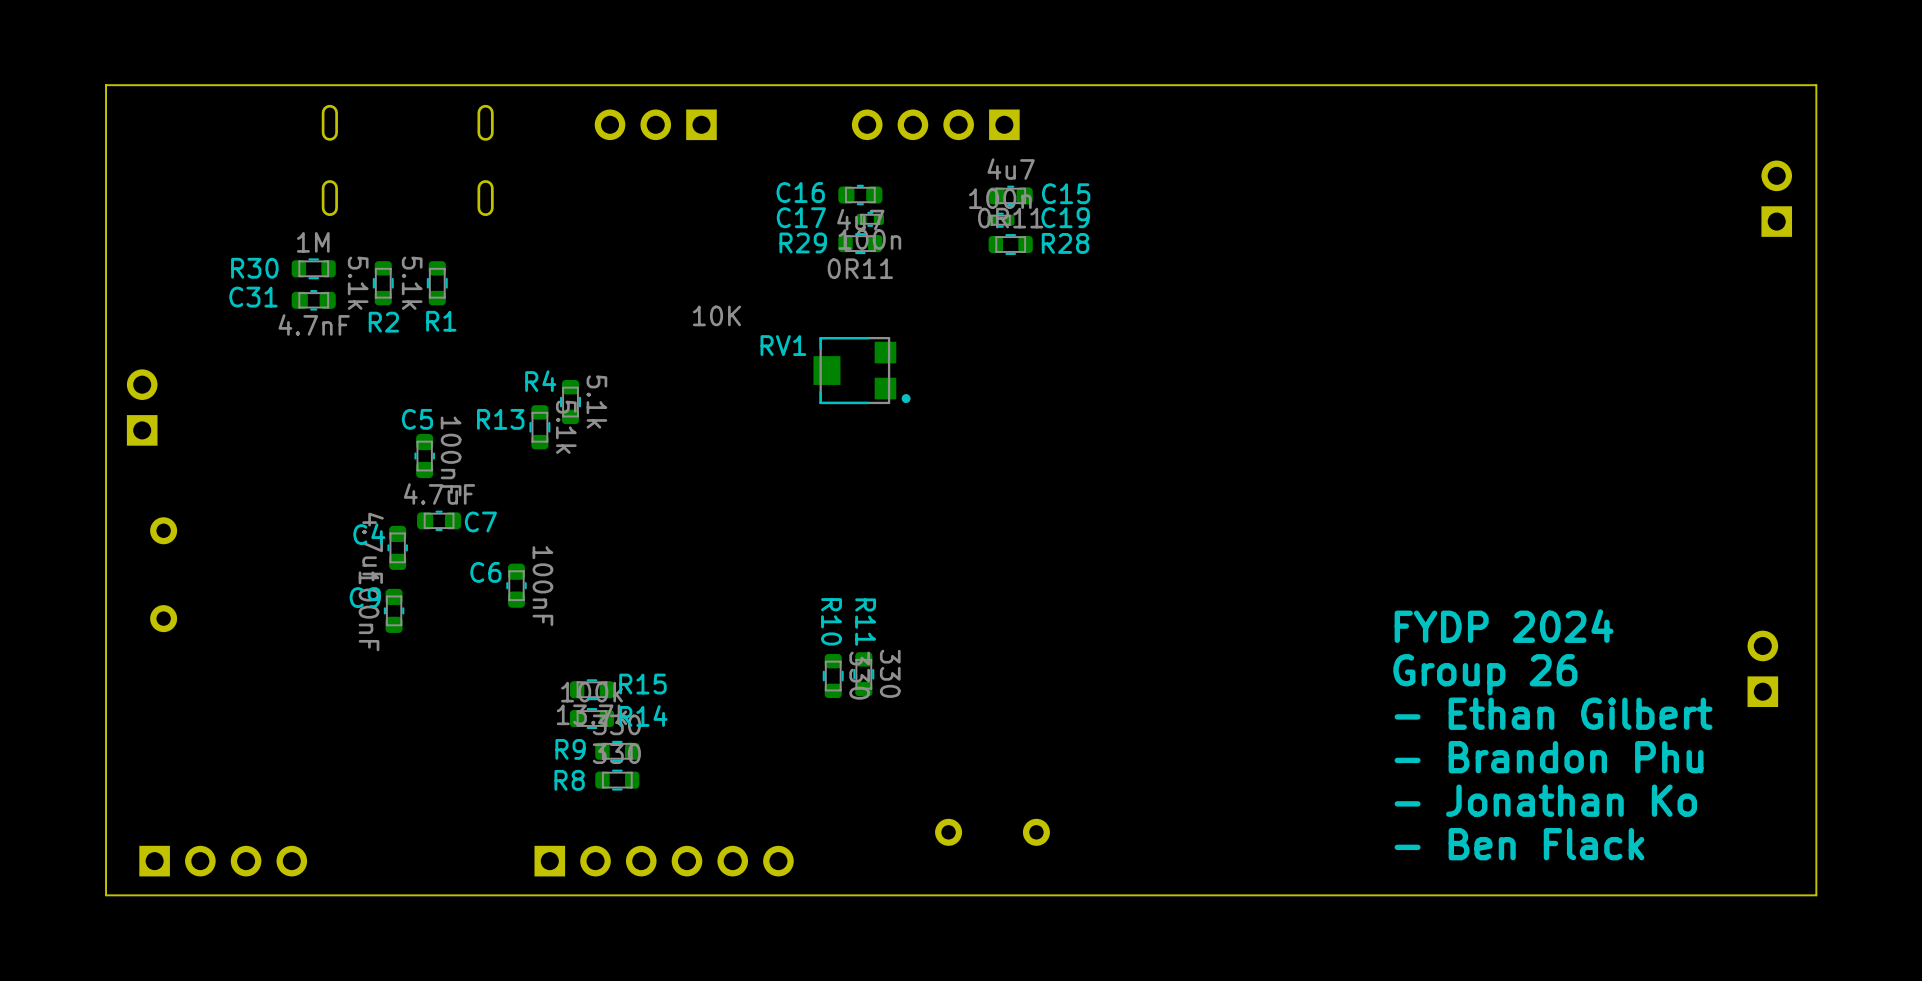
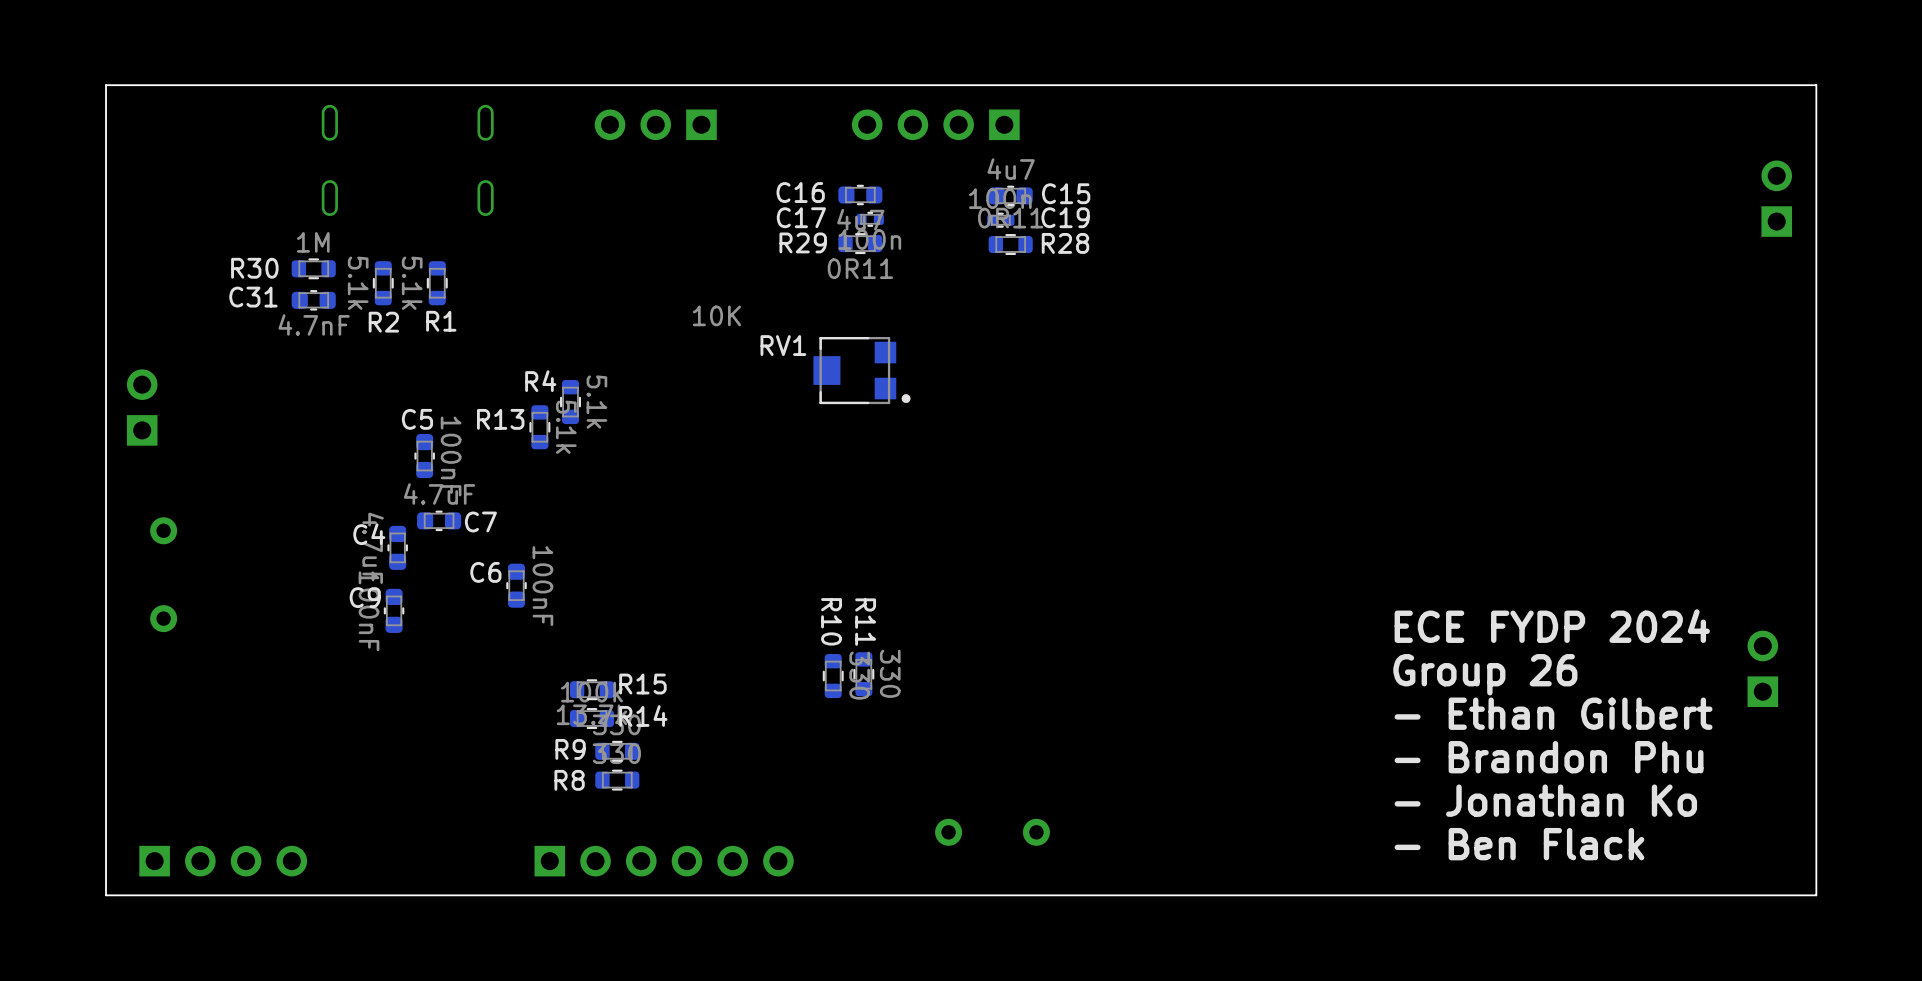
text: FYDP 2024 (1504, 626) -> ECE FYDP 2024 (1552, 626)

